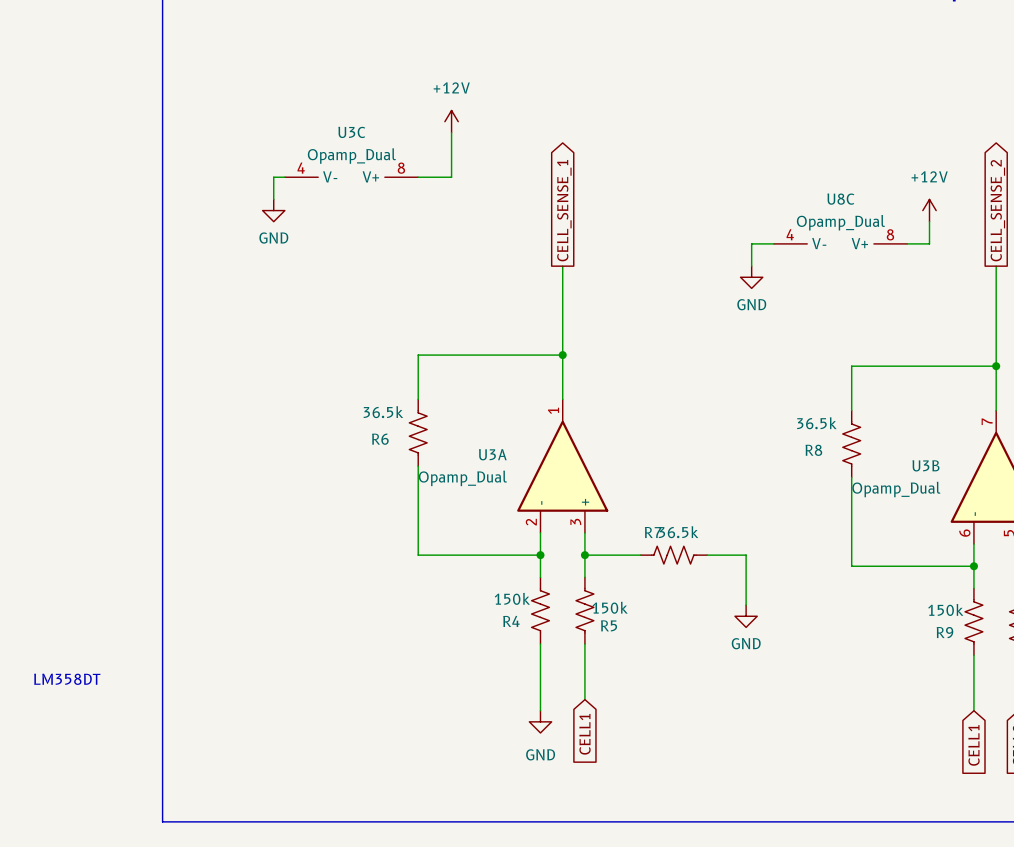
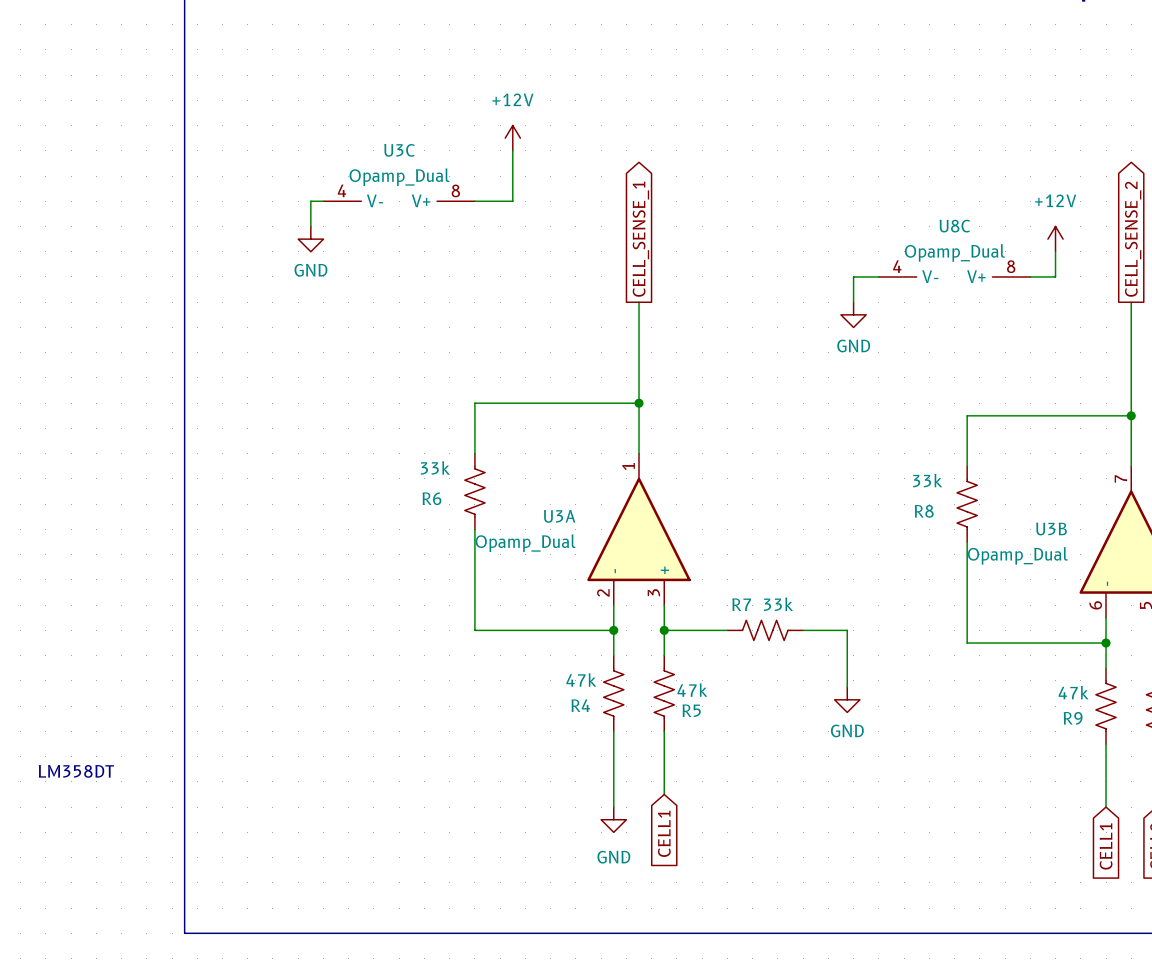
R6 value: 36.5k (383, 412) -> 33k (435, 467)
R8 value: 36.5k (816, 423) -> 33k (927, 480)
R7 value: 36.5k (678, 532) -> 33k (778, 604)
R4 value: 150k (512, 598) -> 47k (581, 679)
R5 value: 150k (610, 607) -> 47k (692, 690)
R9 value: 150k (945, 609) -> 47k (1073, 692)

